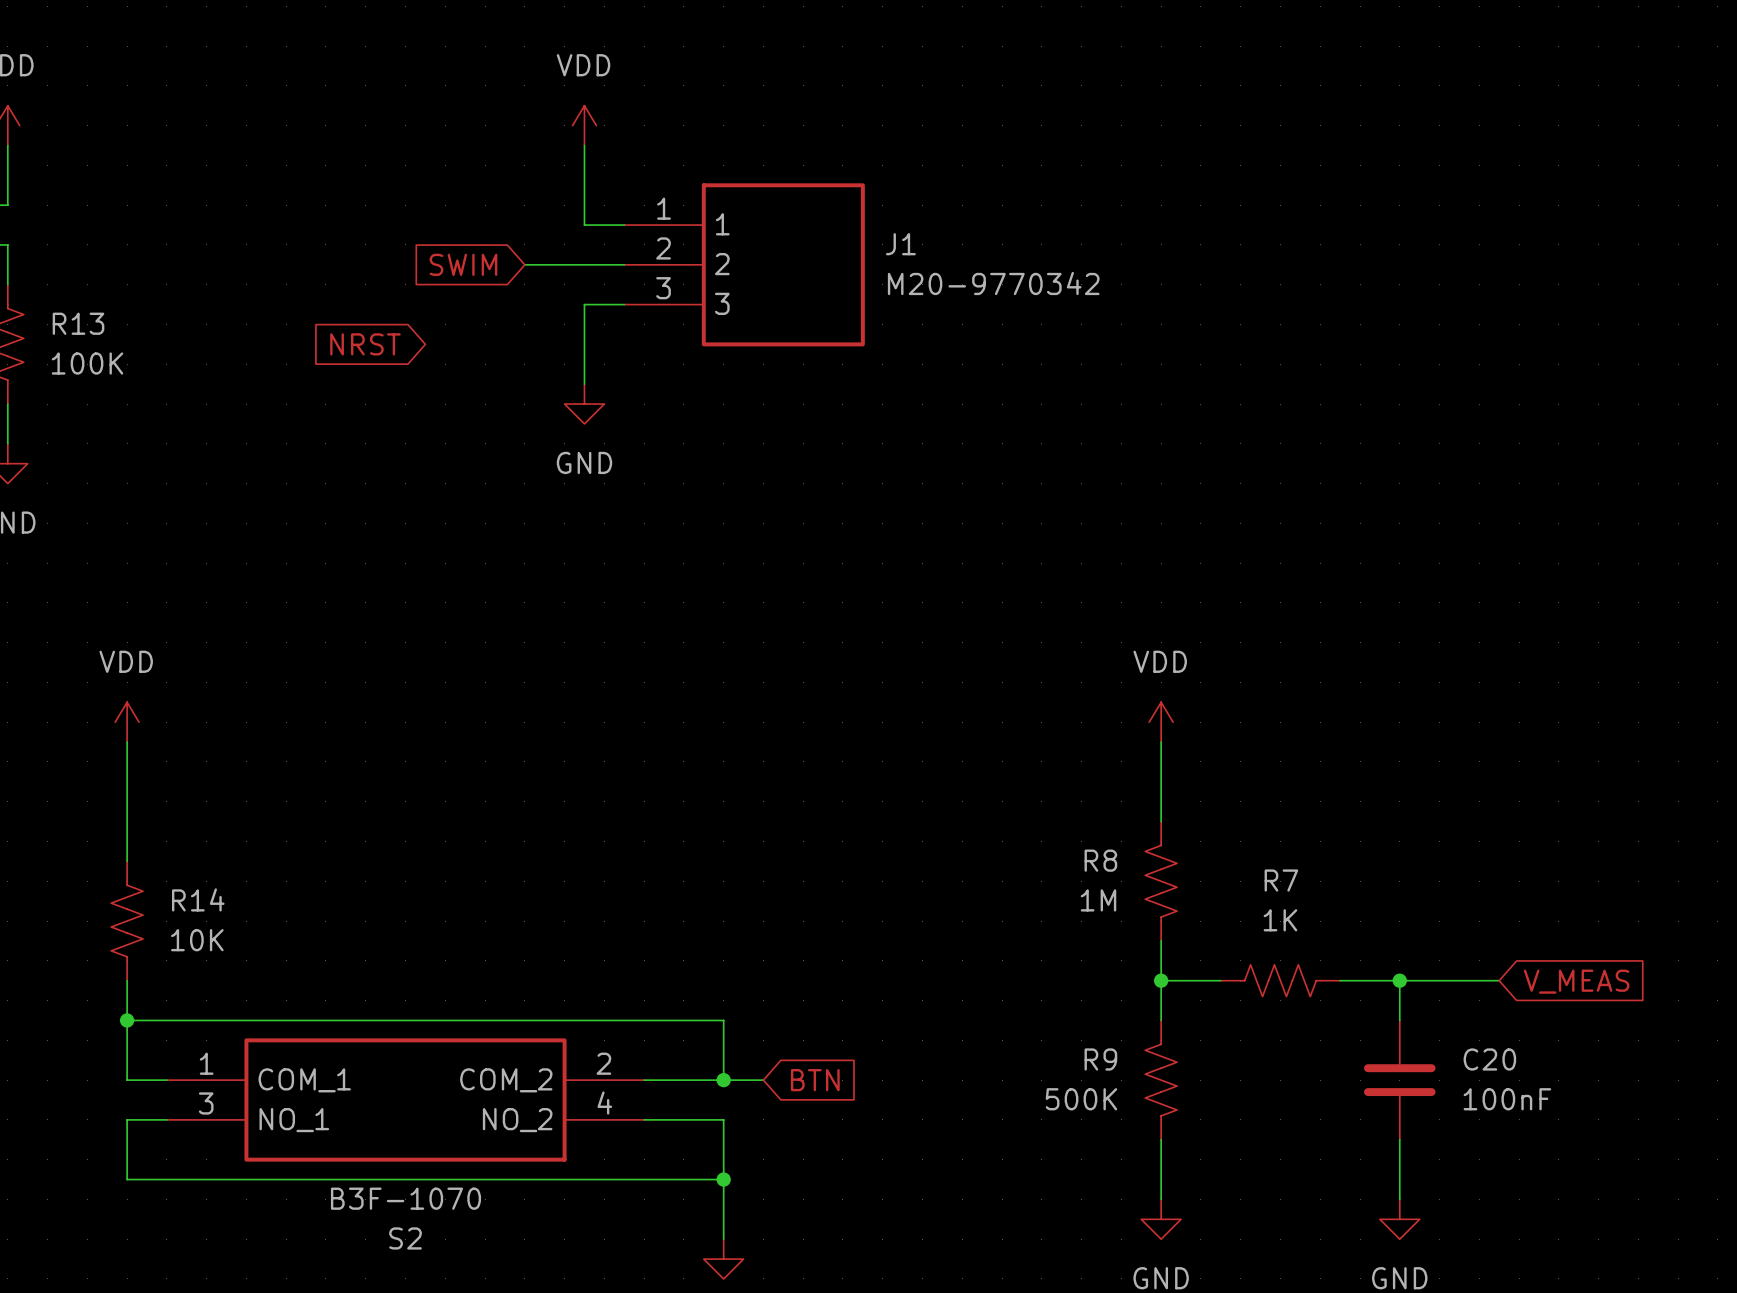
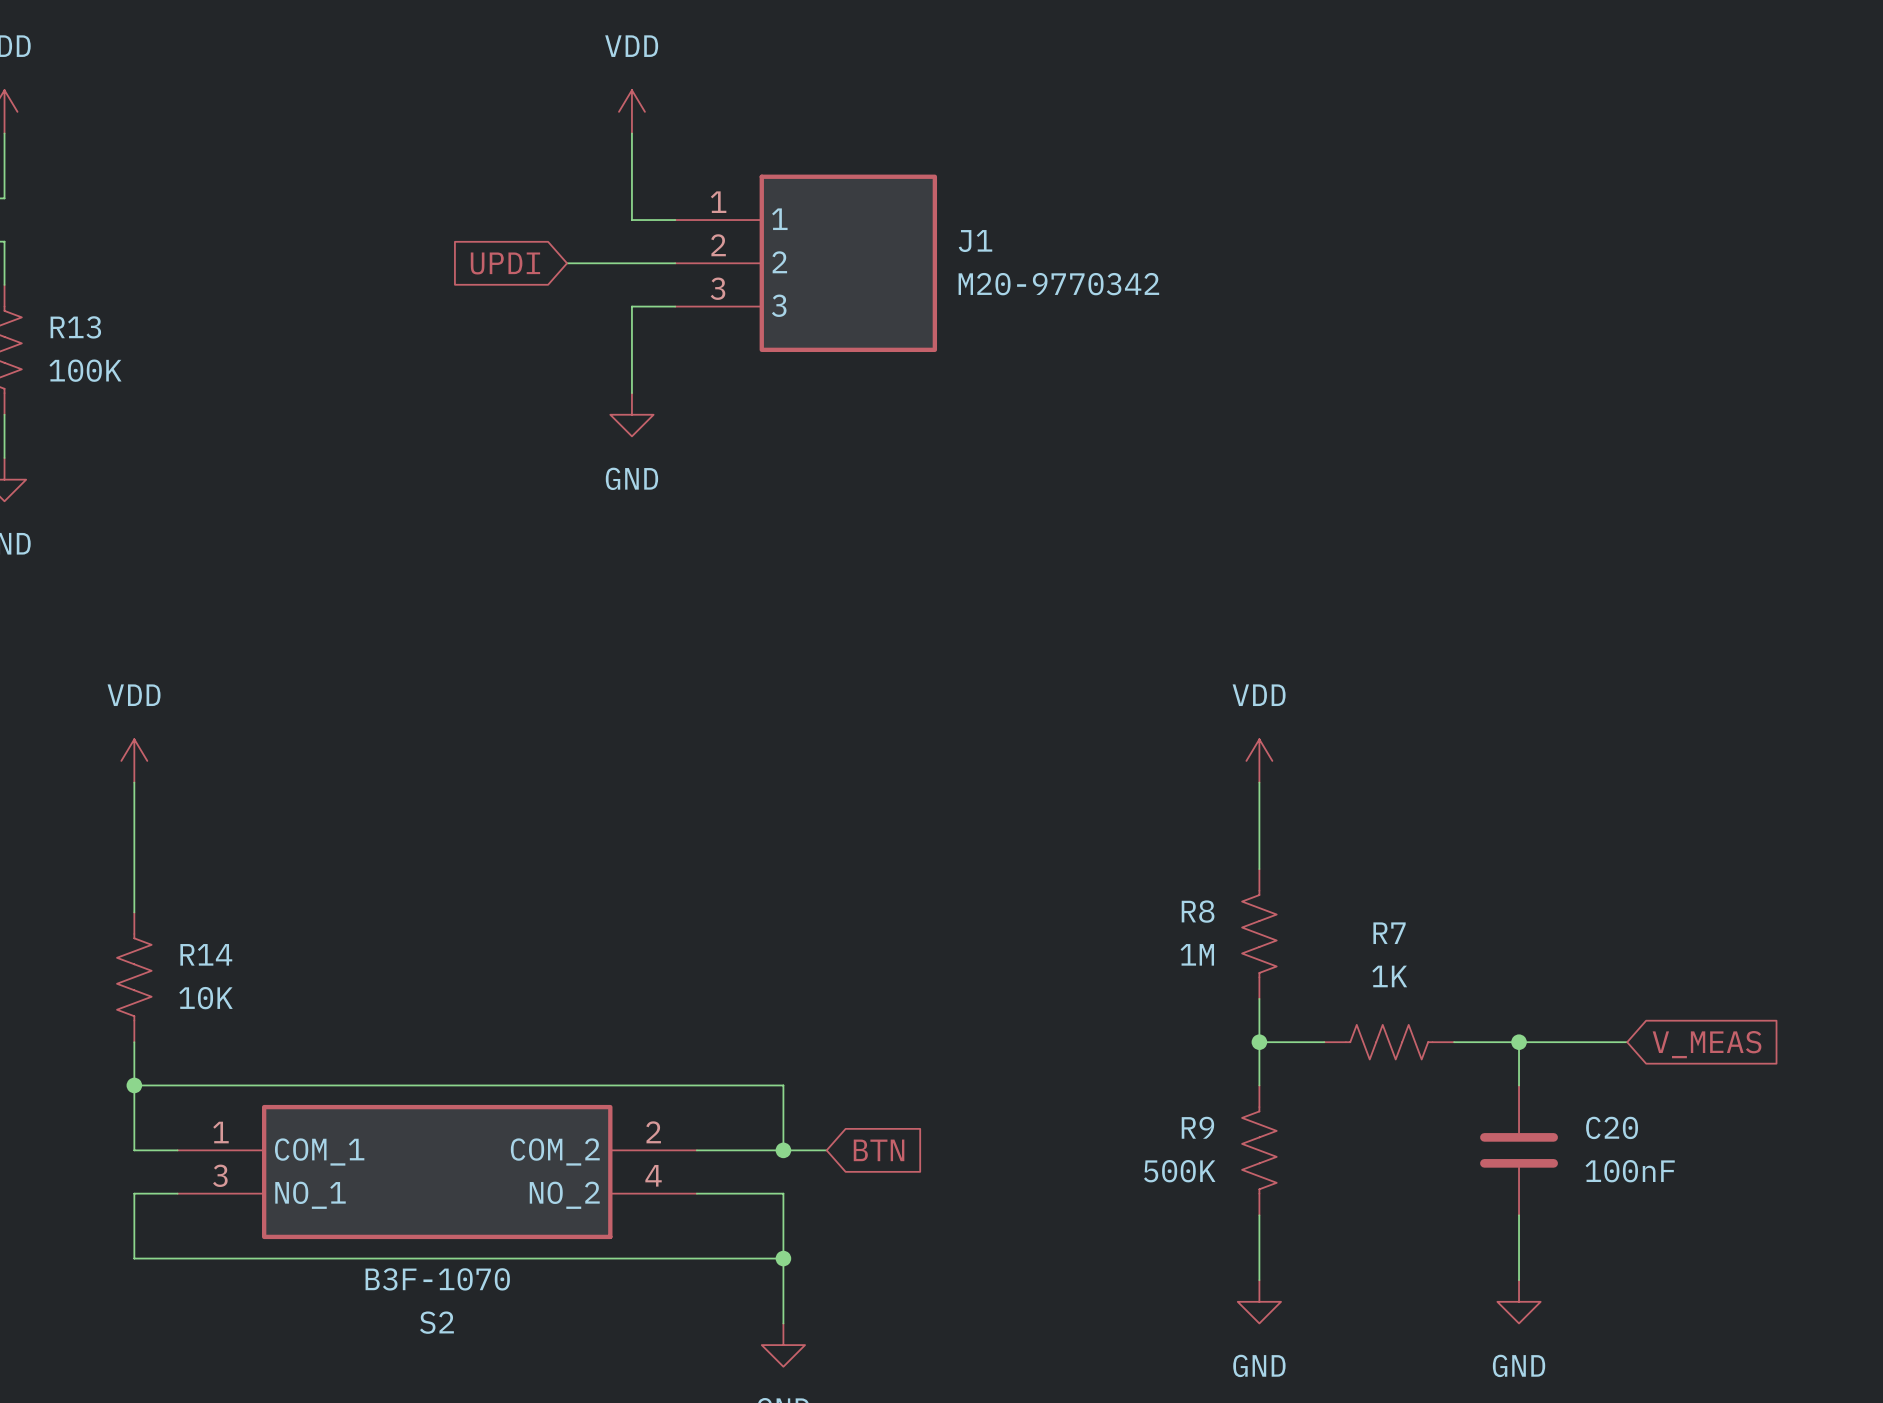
global label: SWIM (463, 264) -> UPDI (505, 263)
global label: NRST (365, 344) -> none

